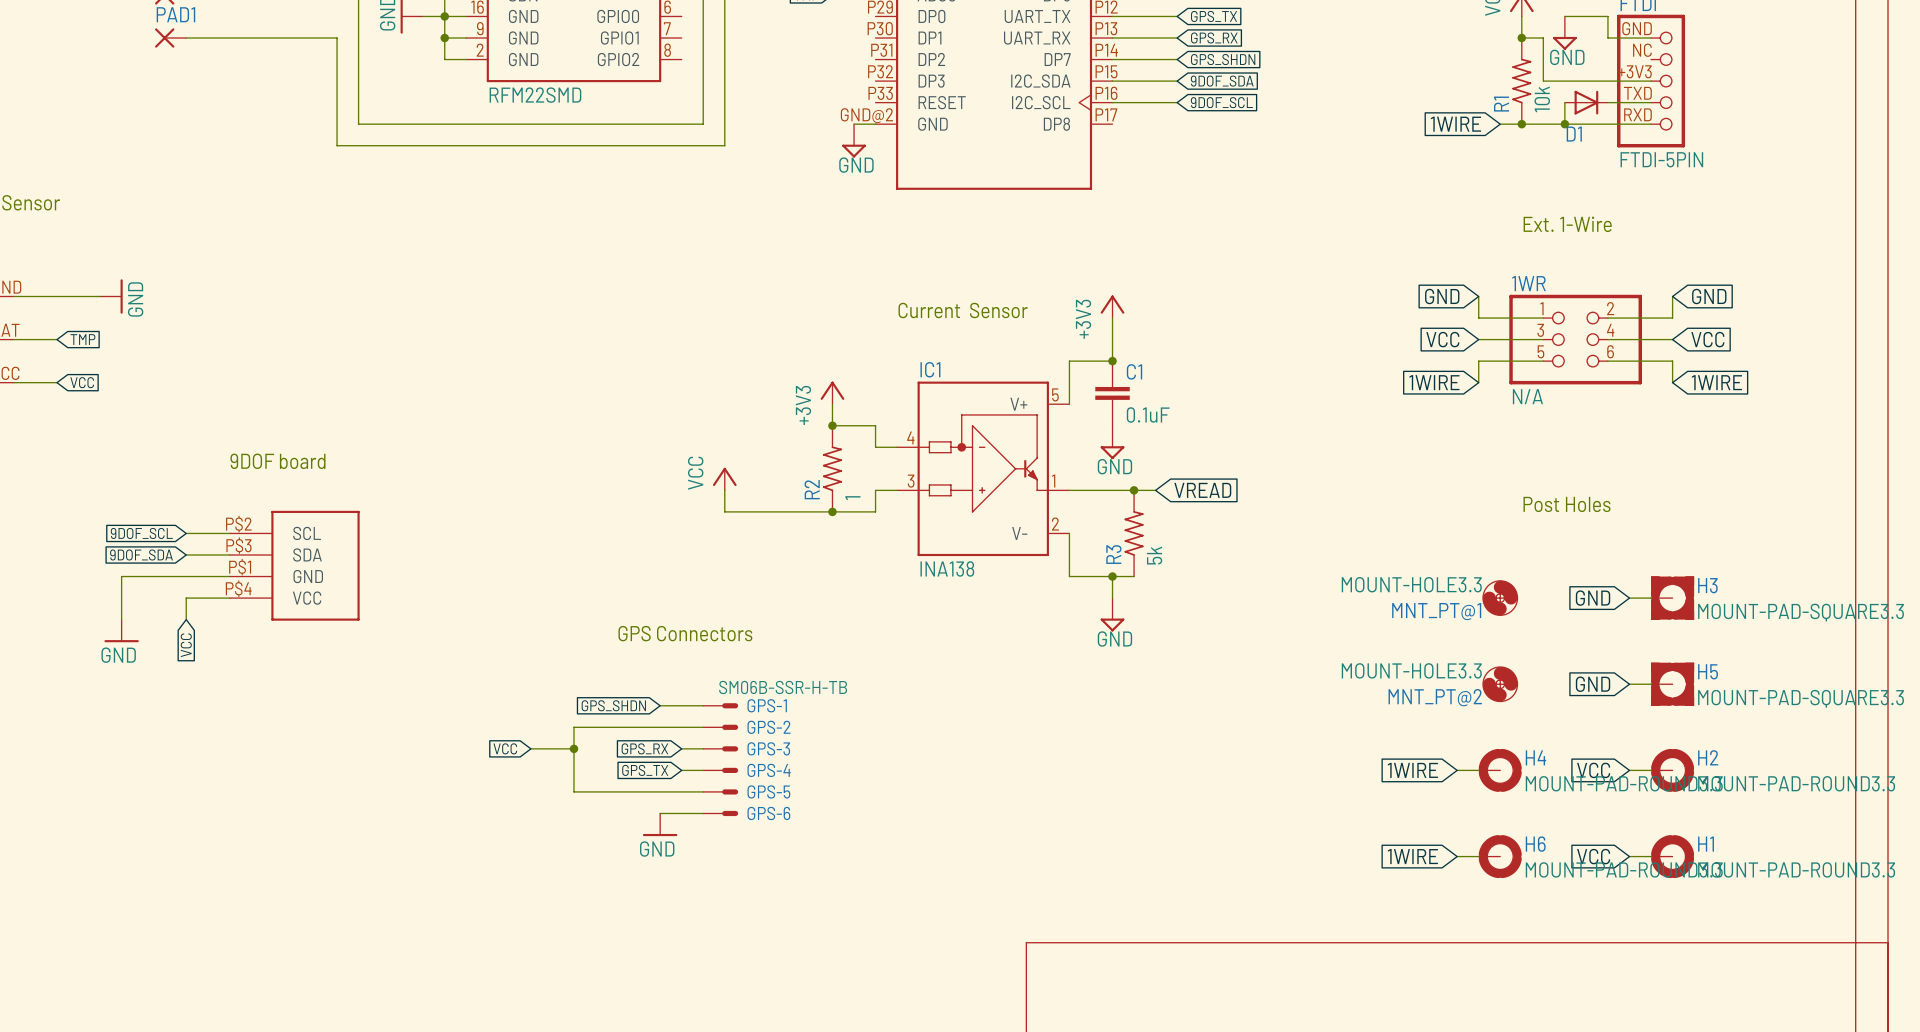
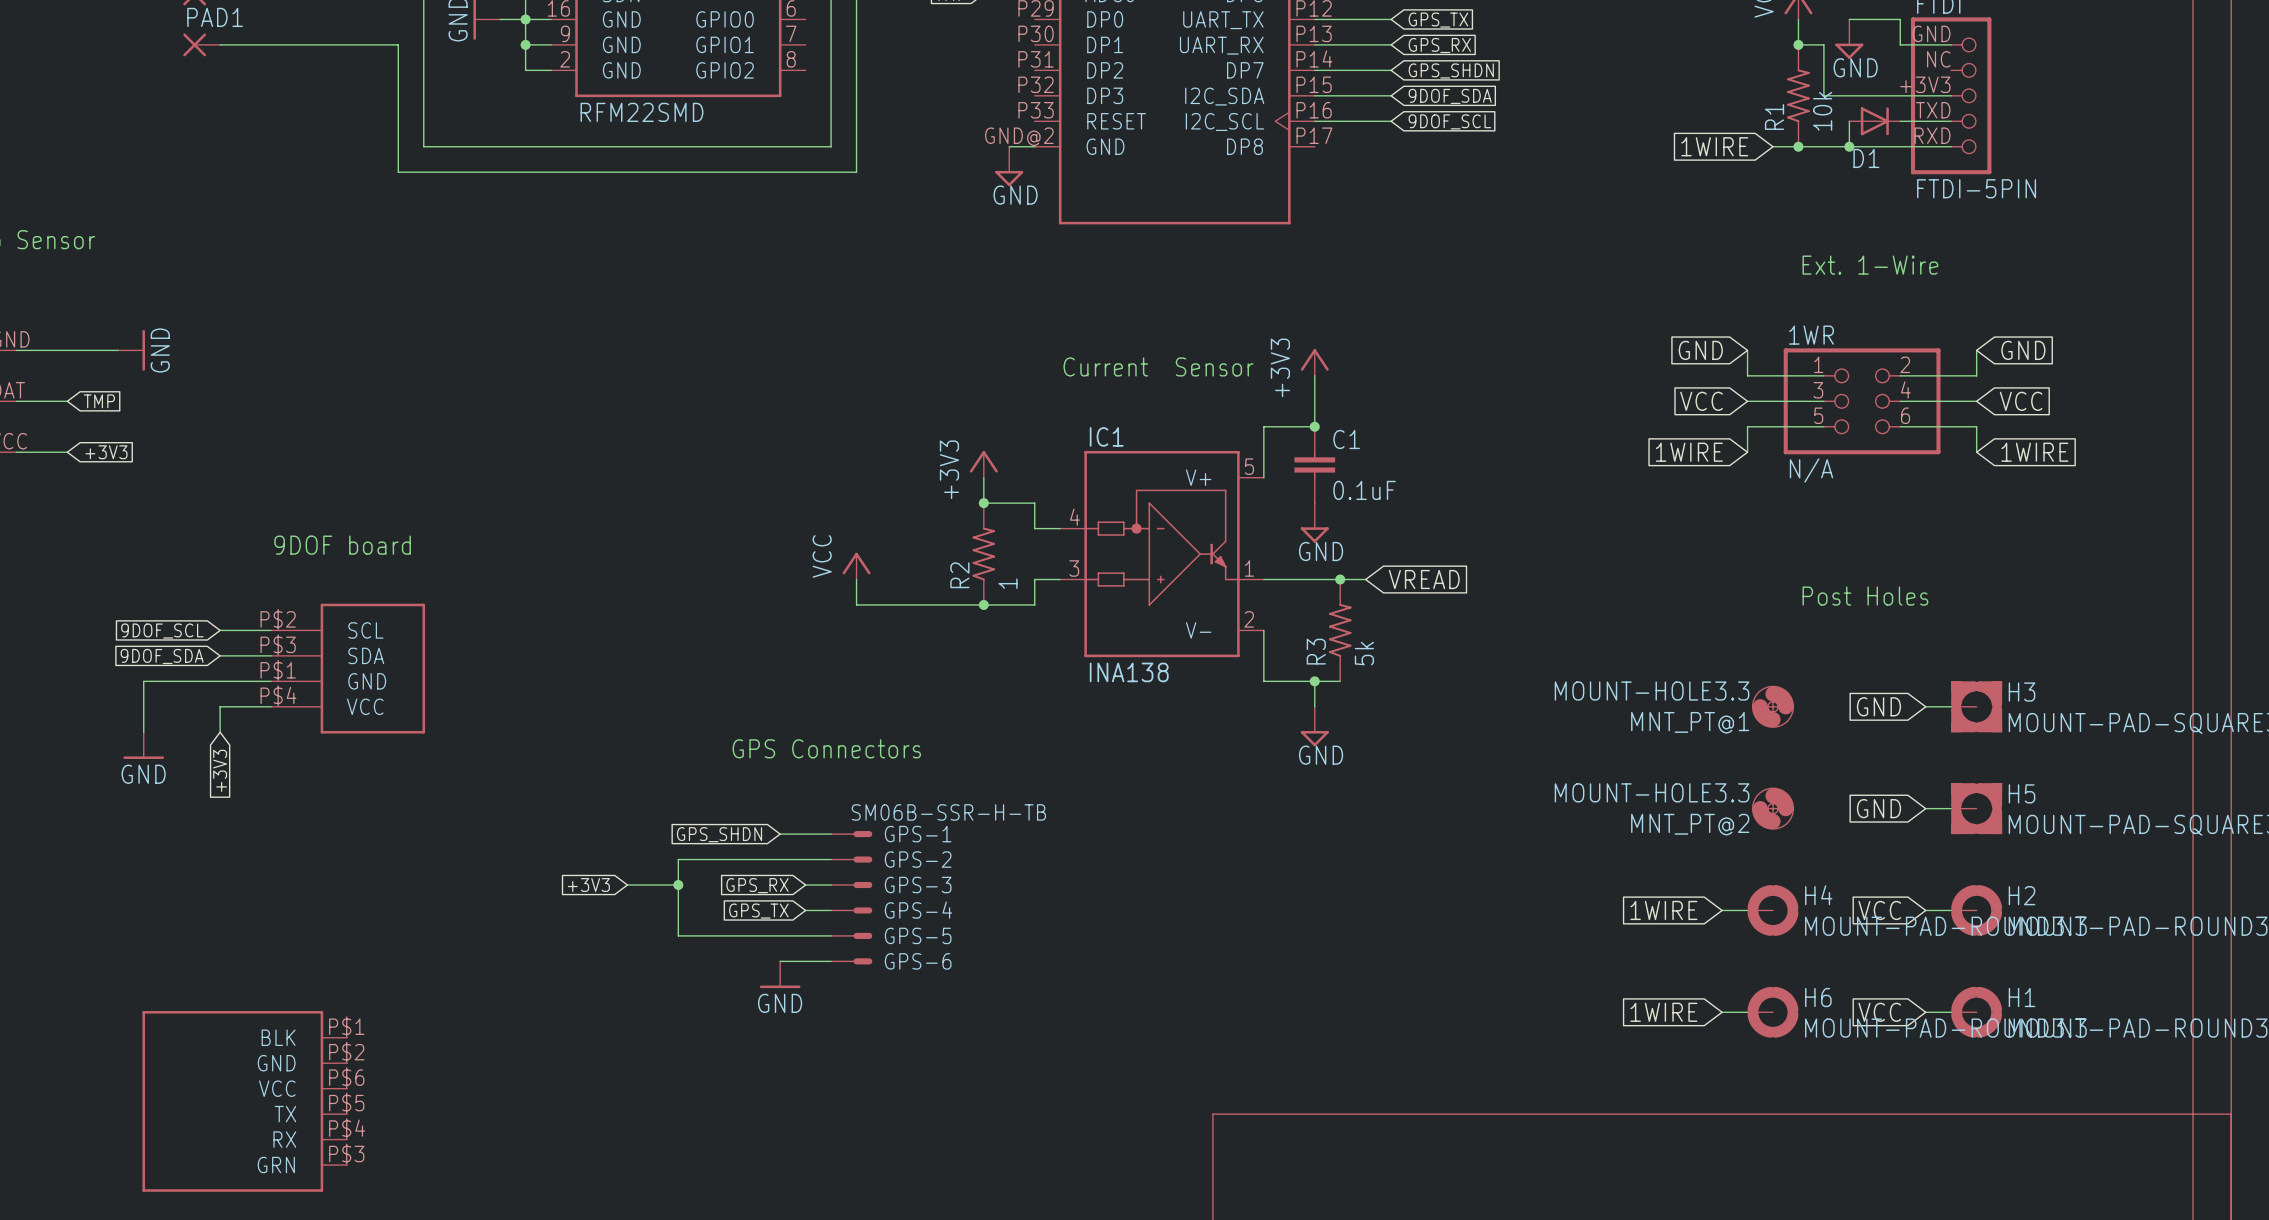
global label: VCC (82, 382) -> +3V3 (106, 452)
global label: VCC (186, 645) -> +3V3 (220, 770)
global label: VCC (505, 748) -> +3V3 (588, 885)
part: none -> (244, 1101)

